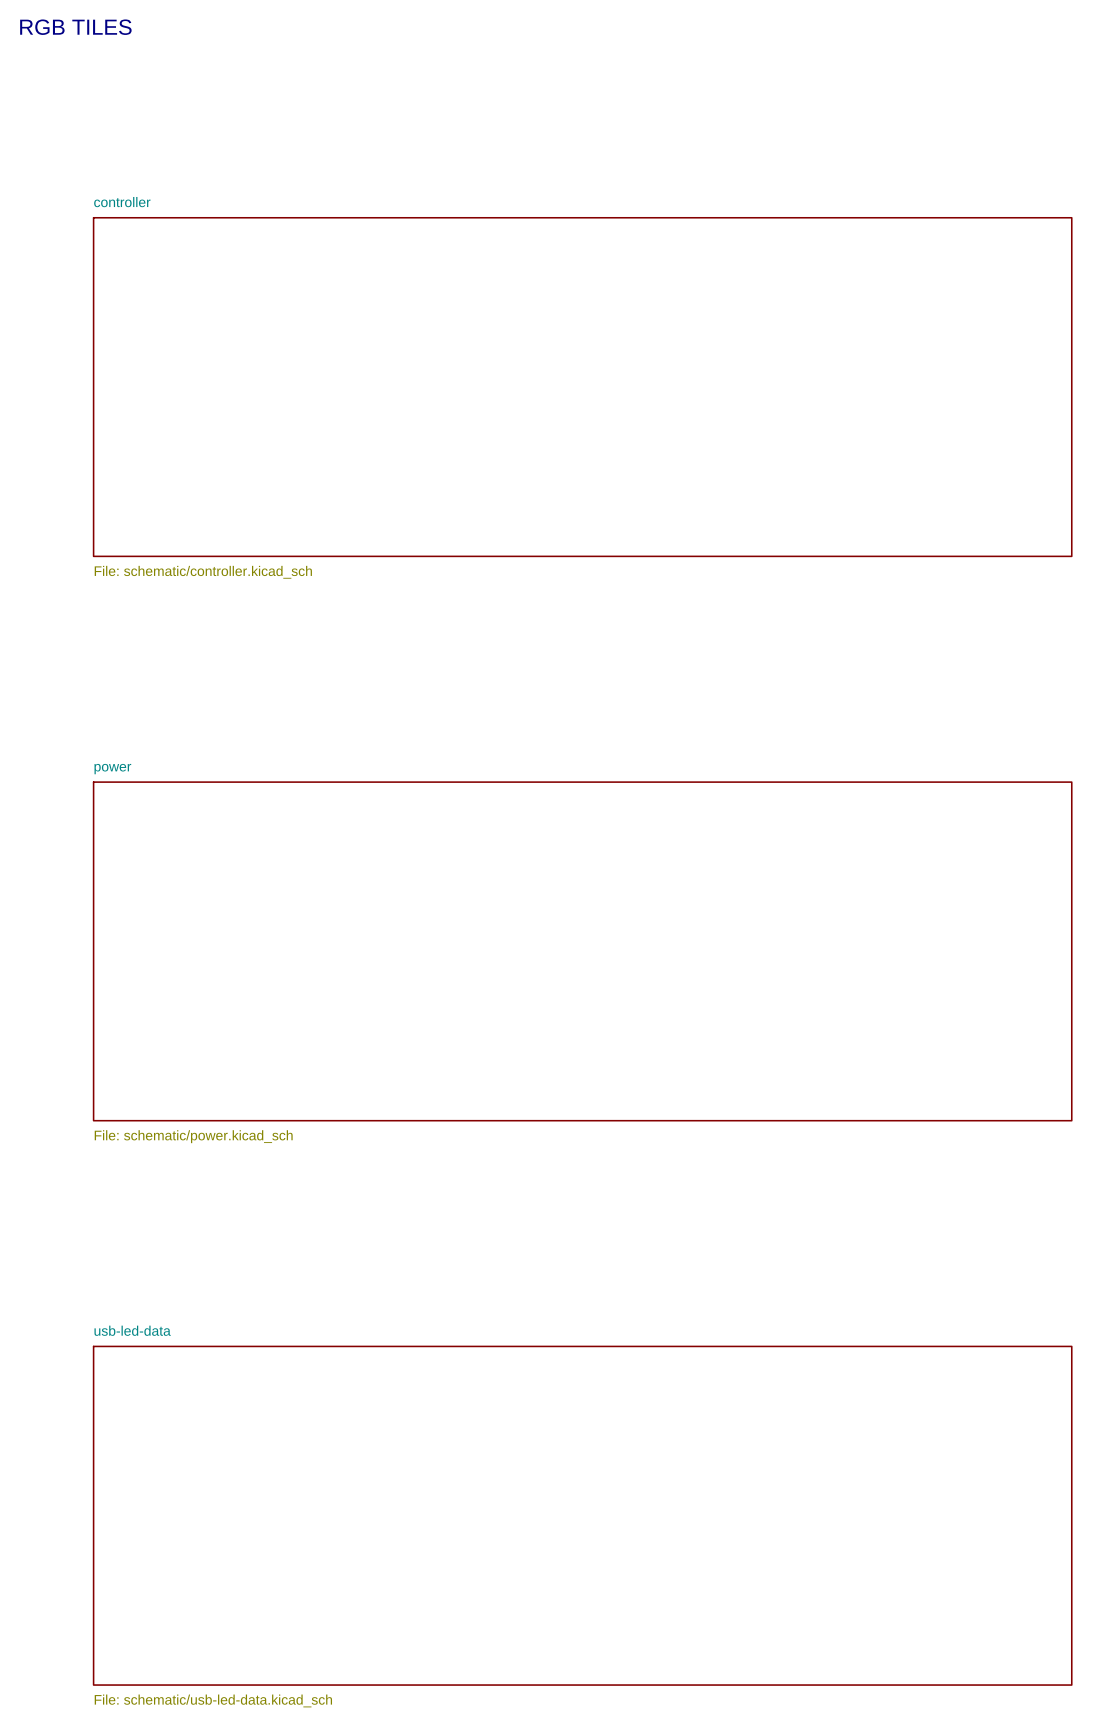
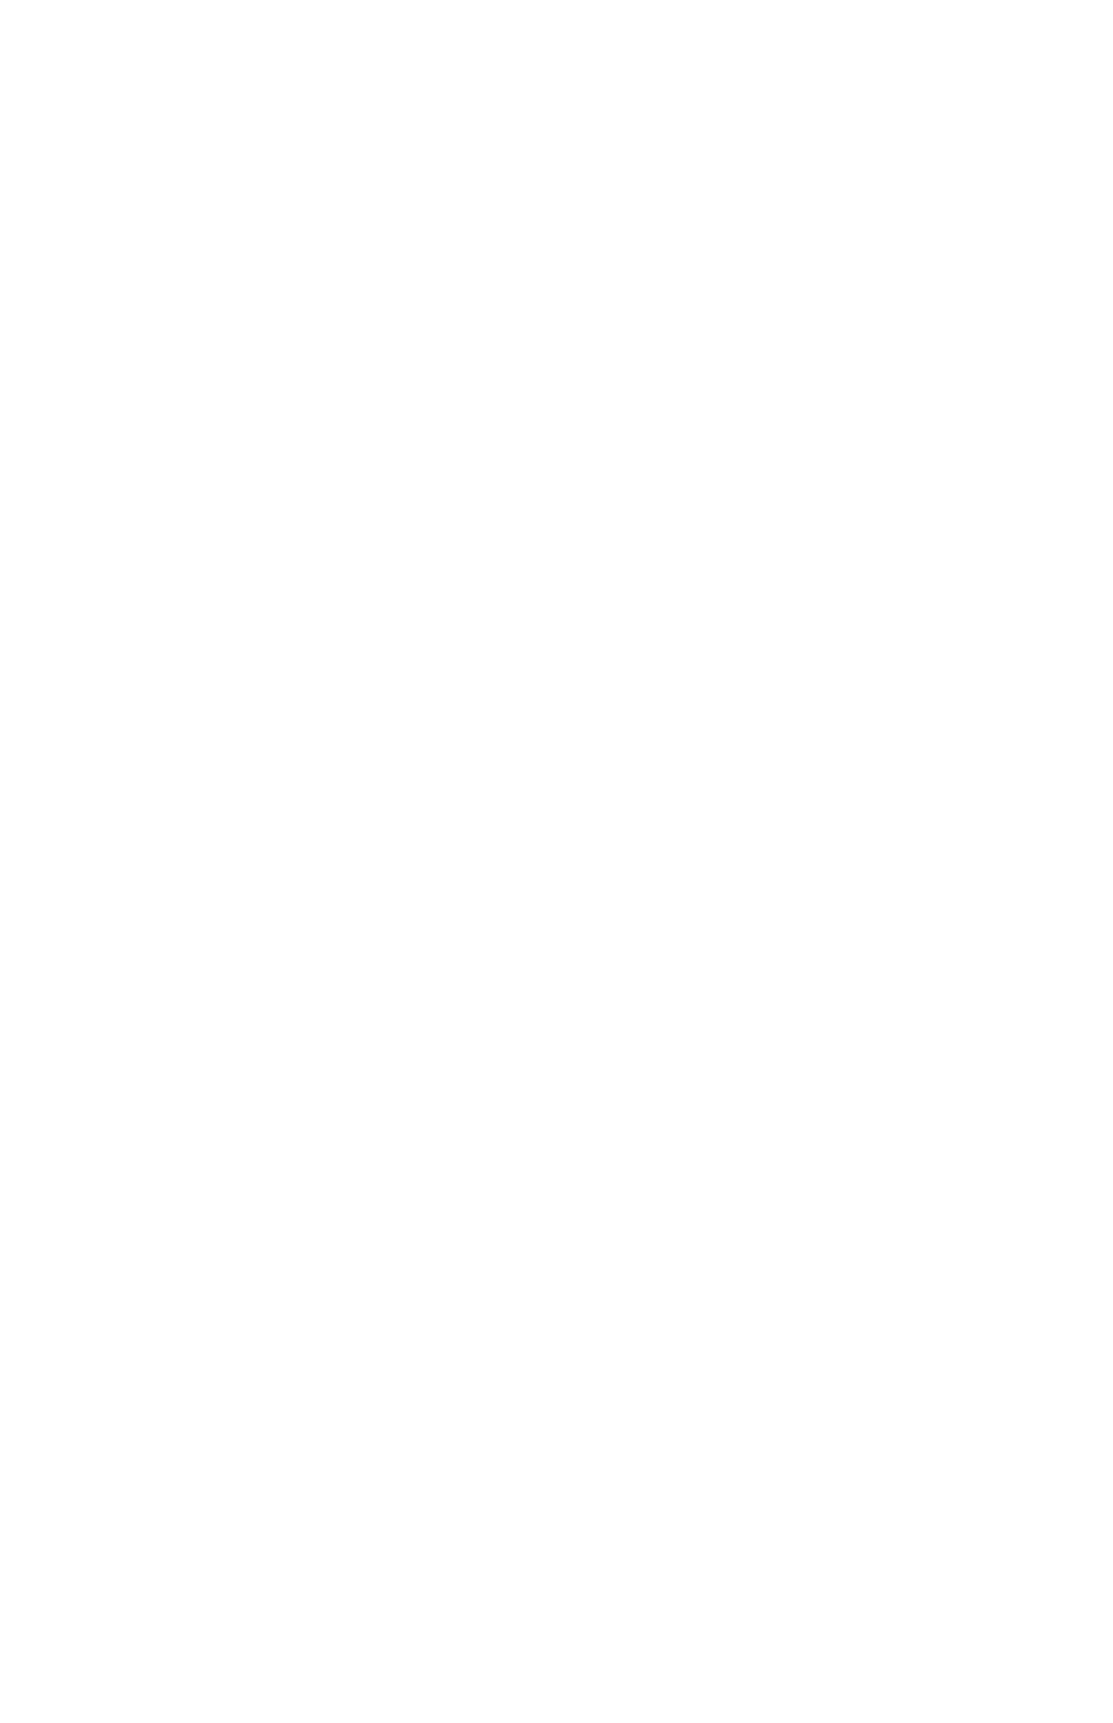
text: RGB TILES (75, 27) -> none
sheet controller: File: schematic/controller.kicad_sch (582, 387) -> none
sheet power: File: schematic/power.kicad_sch (582, 951) -> none
sheet usb-led-data: File: schematic/usb-led-data.kicad_sch (582, 1515) -> none

